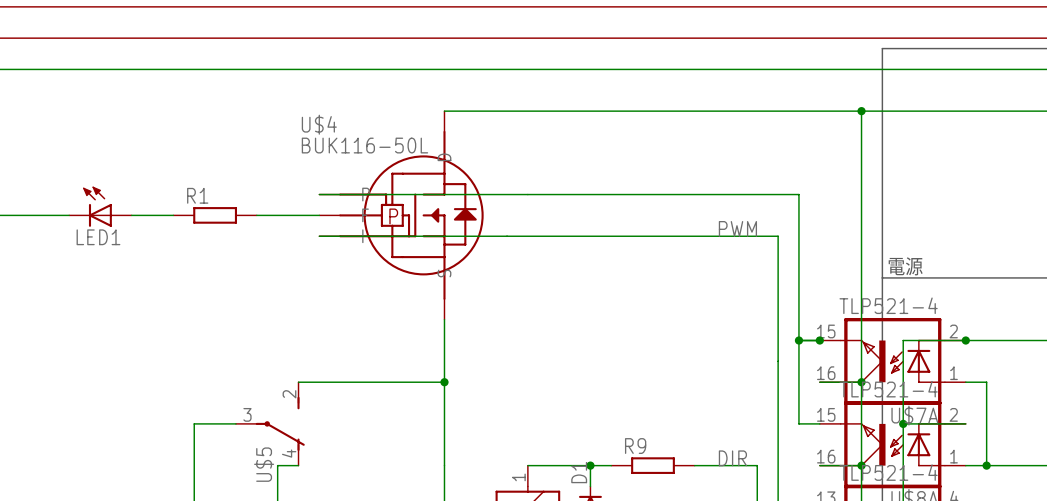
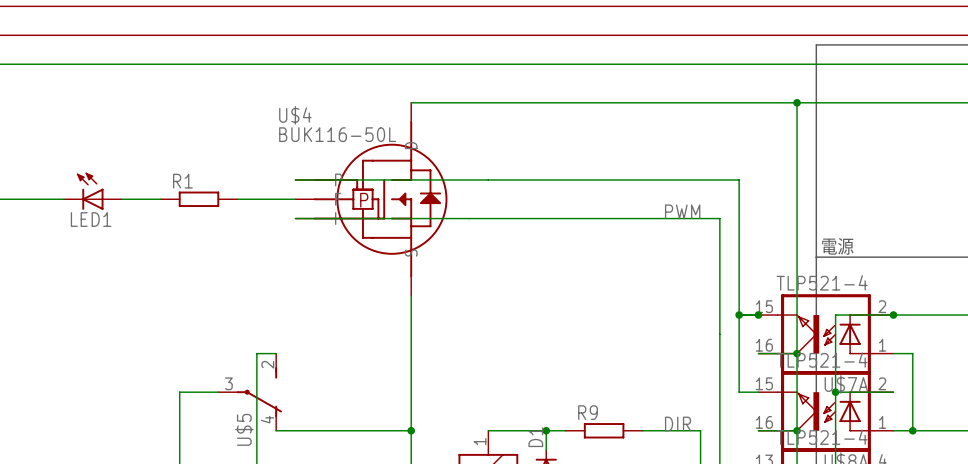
wire: (298, 382) (444, 382) -> (276, 430) (411, 430)
junction: (444, 382) -> none
wire: (277, 465) (298, 465) -> (256, 430) (256, 353) (276, 353)
junction: none -> (411, 430)

